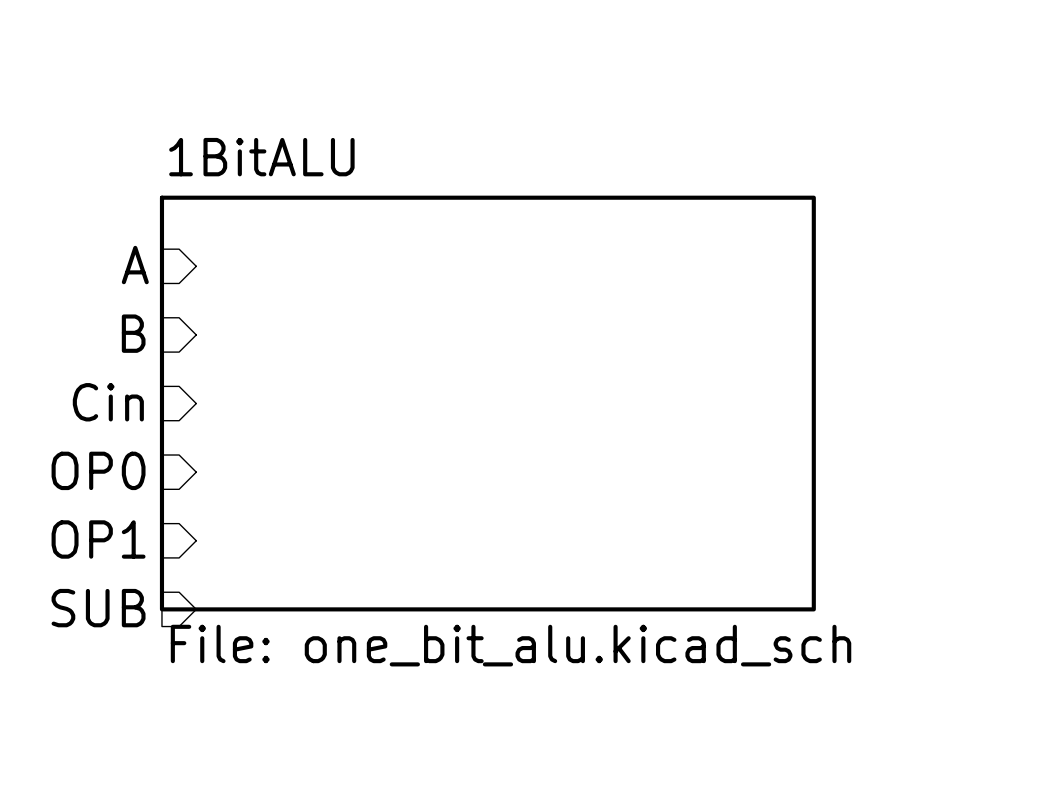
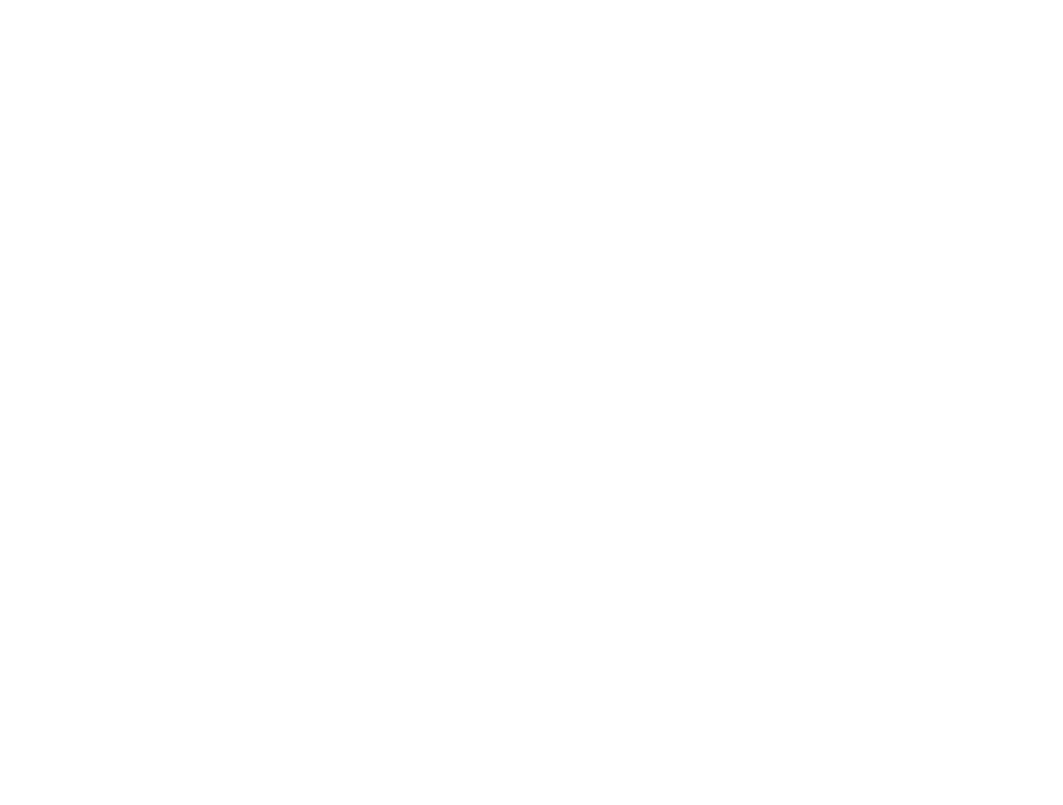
hierarchical label: A (135, 265) -> none
hierarchical label: B (133, 333) -> none
hierarchical label: Cin (108, 402) -> none
sheet 1BitALU: File: one_bit_alu.kicad_sch (487, 403) -> none
hierarchical label: OP0 (98, 470) -> none
hierarchical label: OP1 (98, 539) -> none
hierarchical label: SUB (98, 608) -> none

